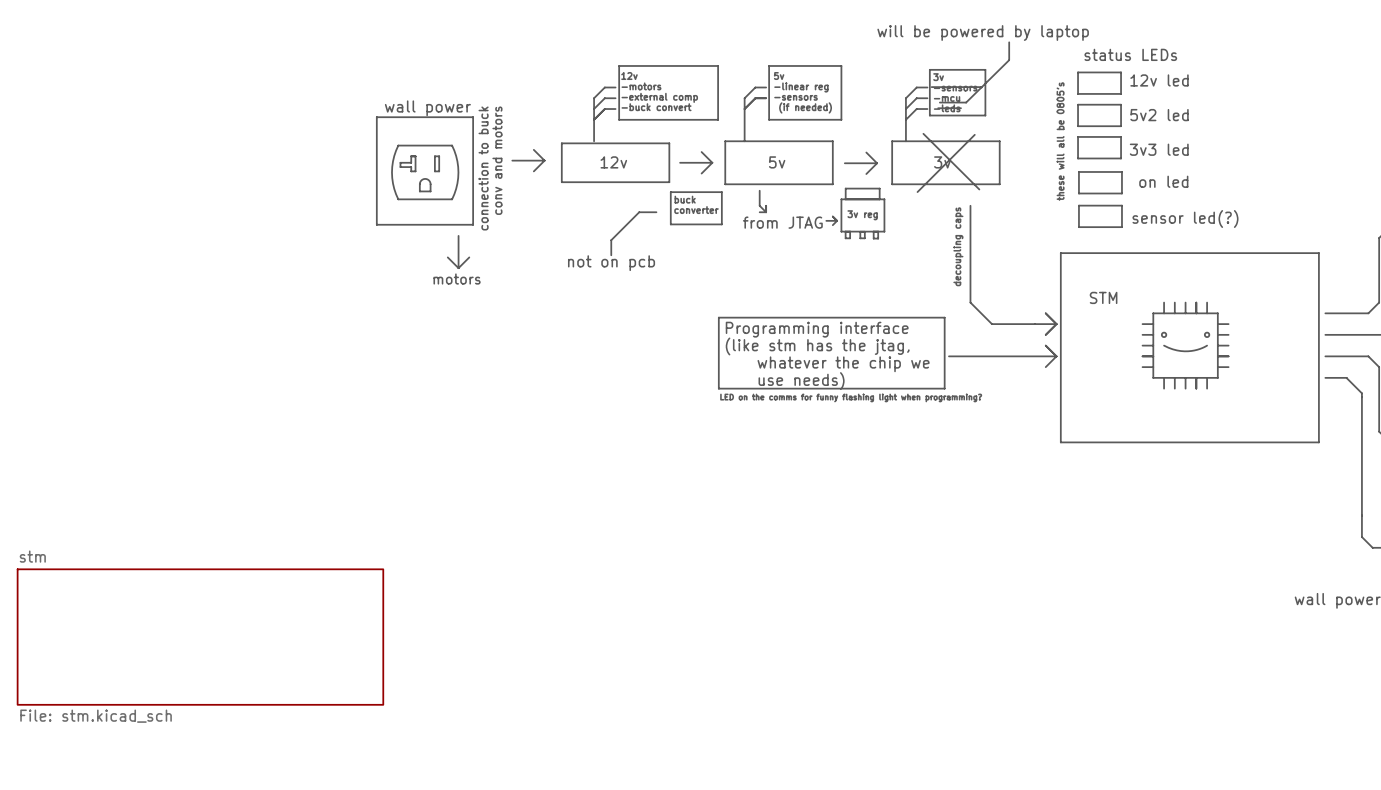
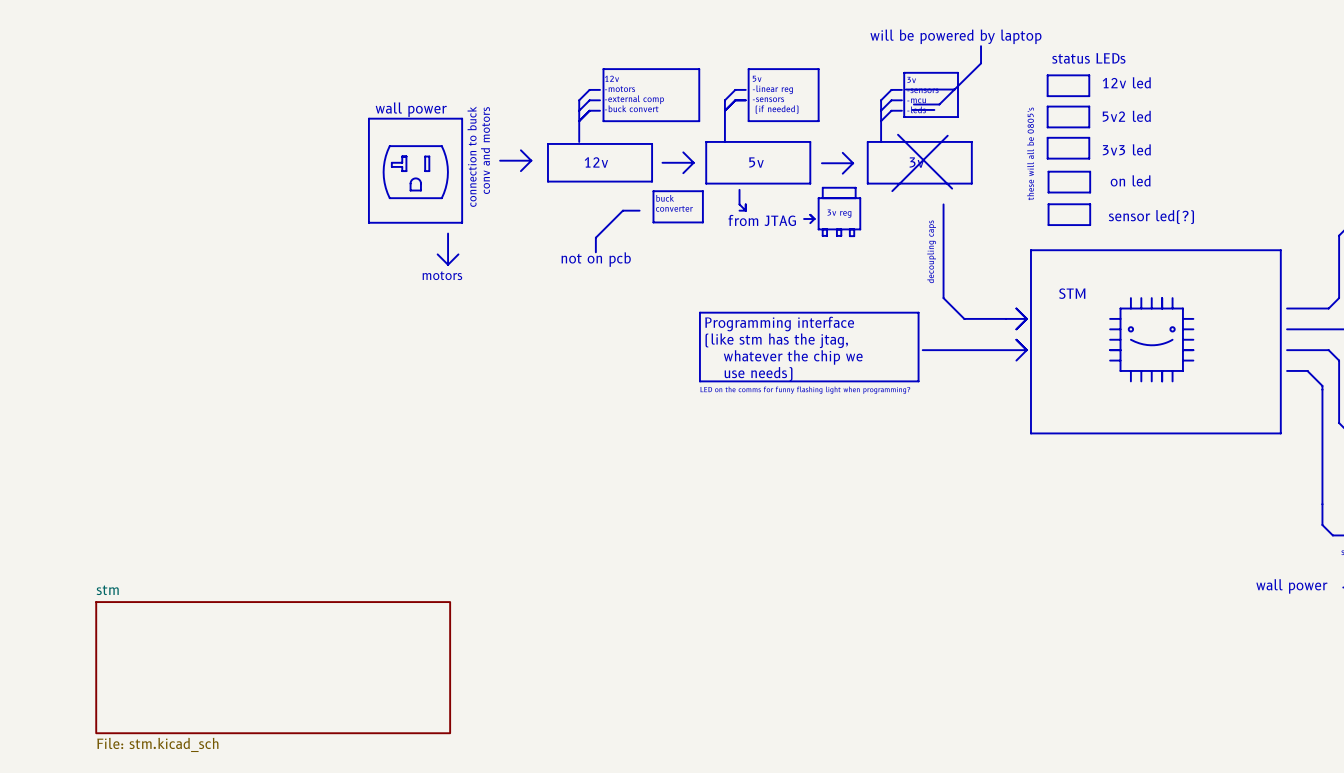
sheet stm position: (200, 637) -> (273, 667)

